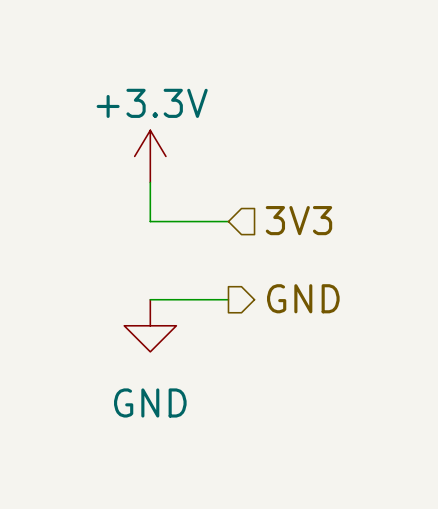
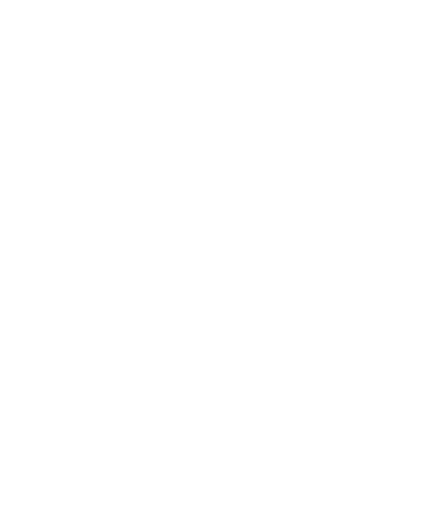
power symbol: +3.3V (150, 156) -> none
wire: (150, 182) (150, 221) (228, 221) -> none
hierarchical label: 3V3 (298, 220) -> none
hierarchical label: GND (303, 298) -> none
wire: (150, 299) (228, 299) -> none
power symbol: GND (150, 325) -> none

